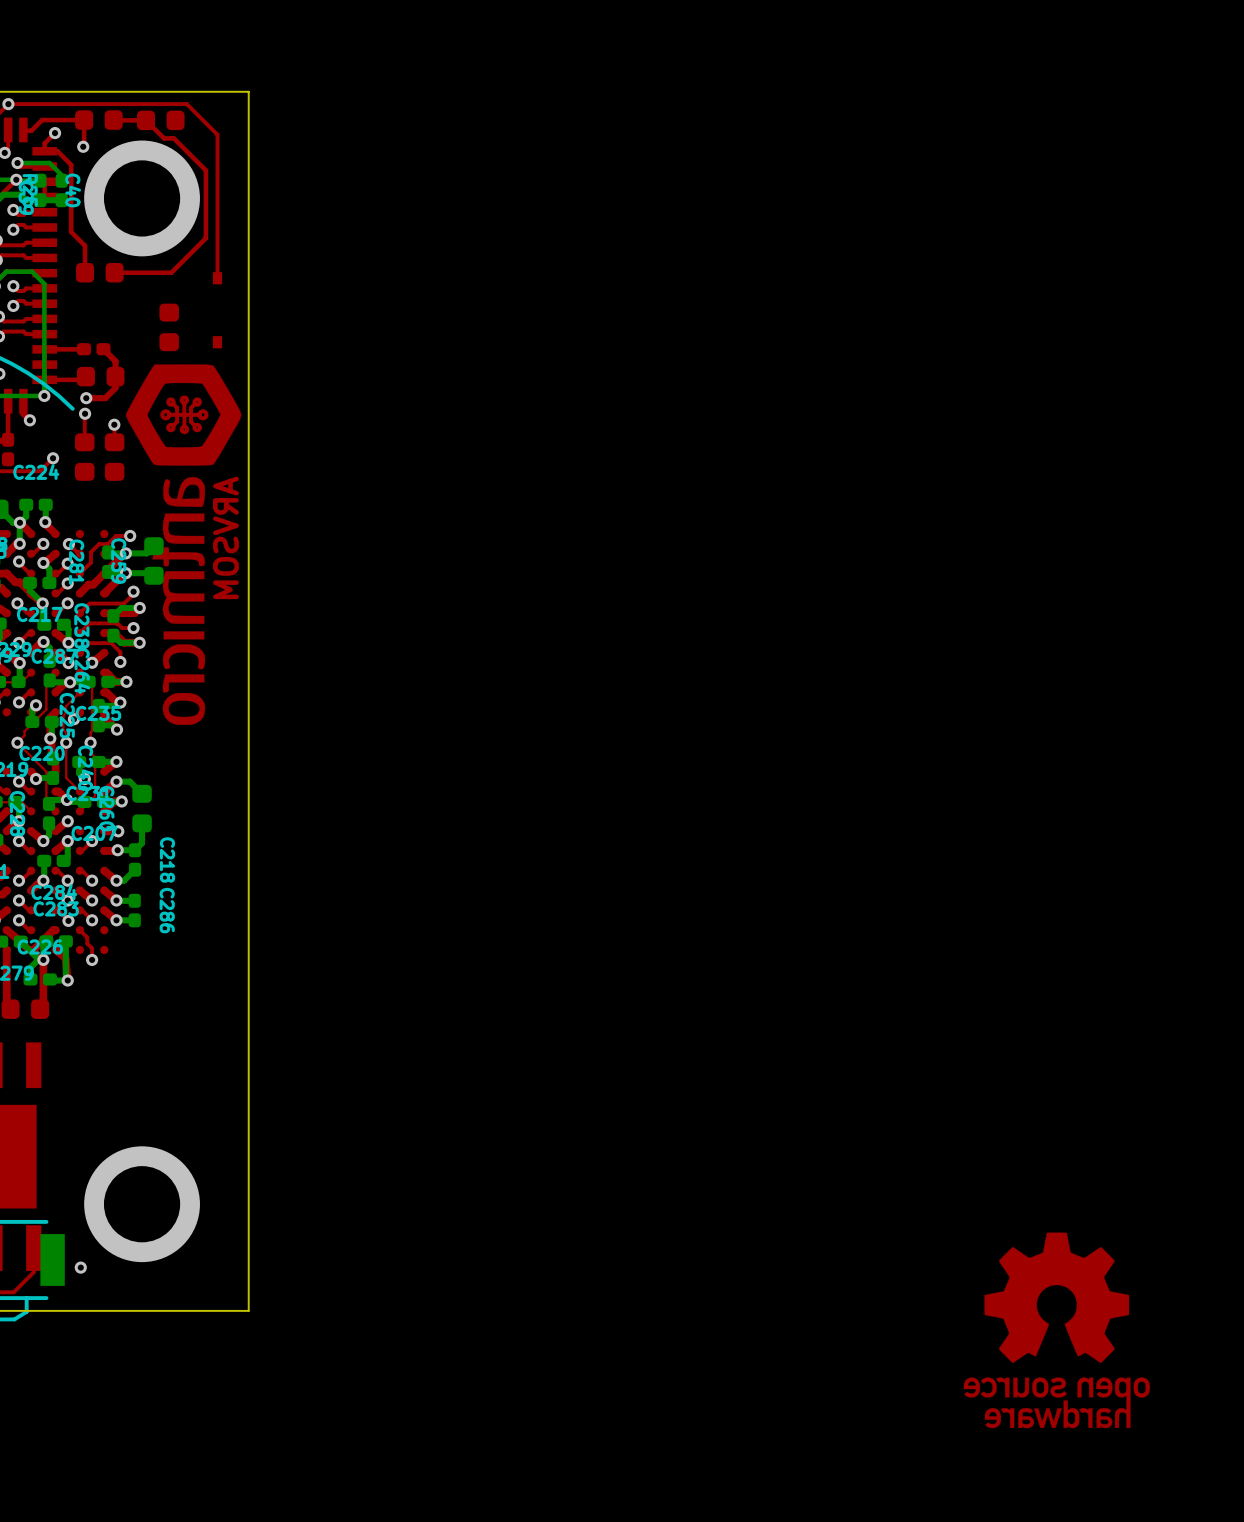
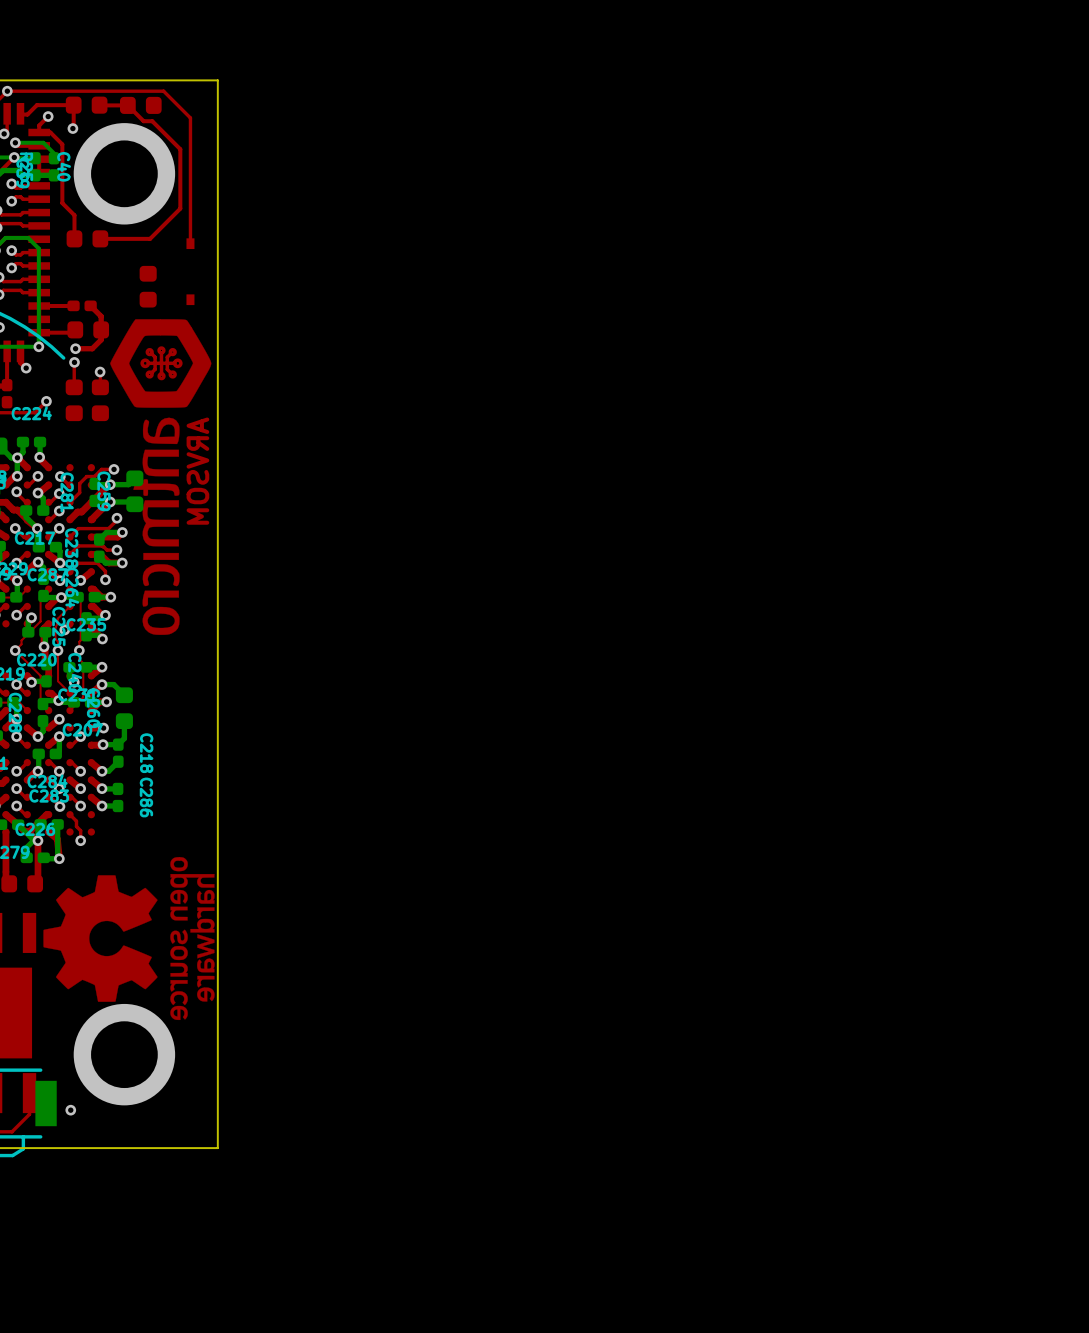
drawing: none -> [43, 857, 215, 1021]
drawing: [963, 1232, 1150, 1429] -> none

